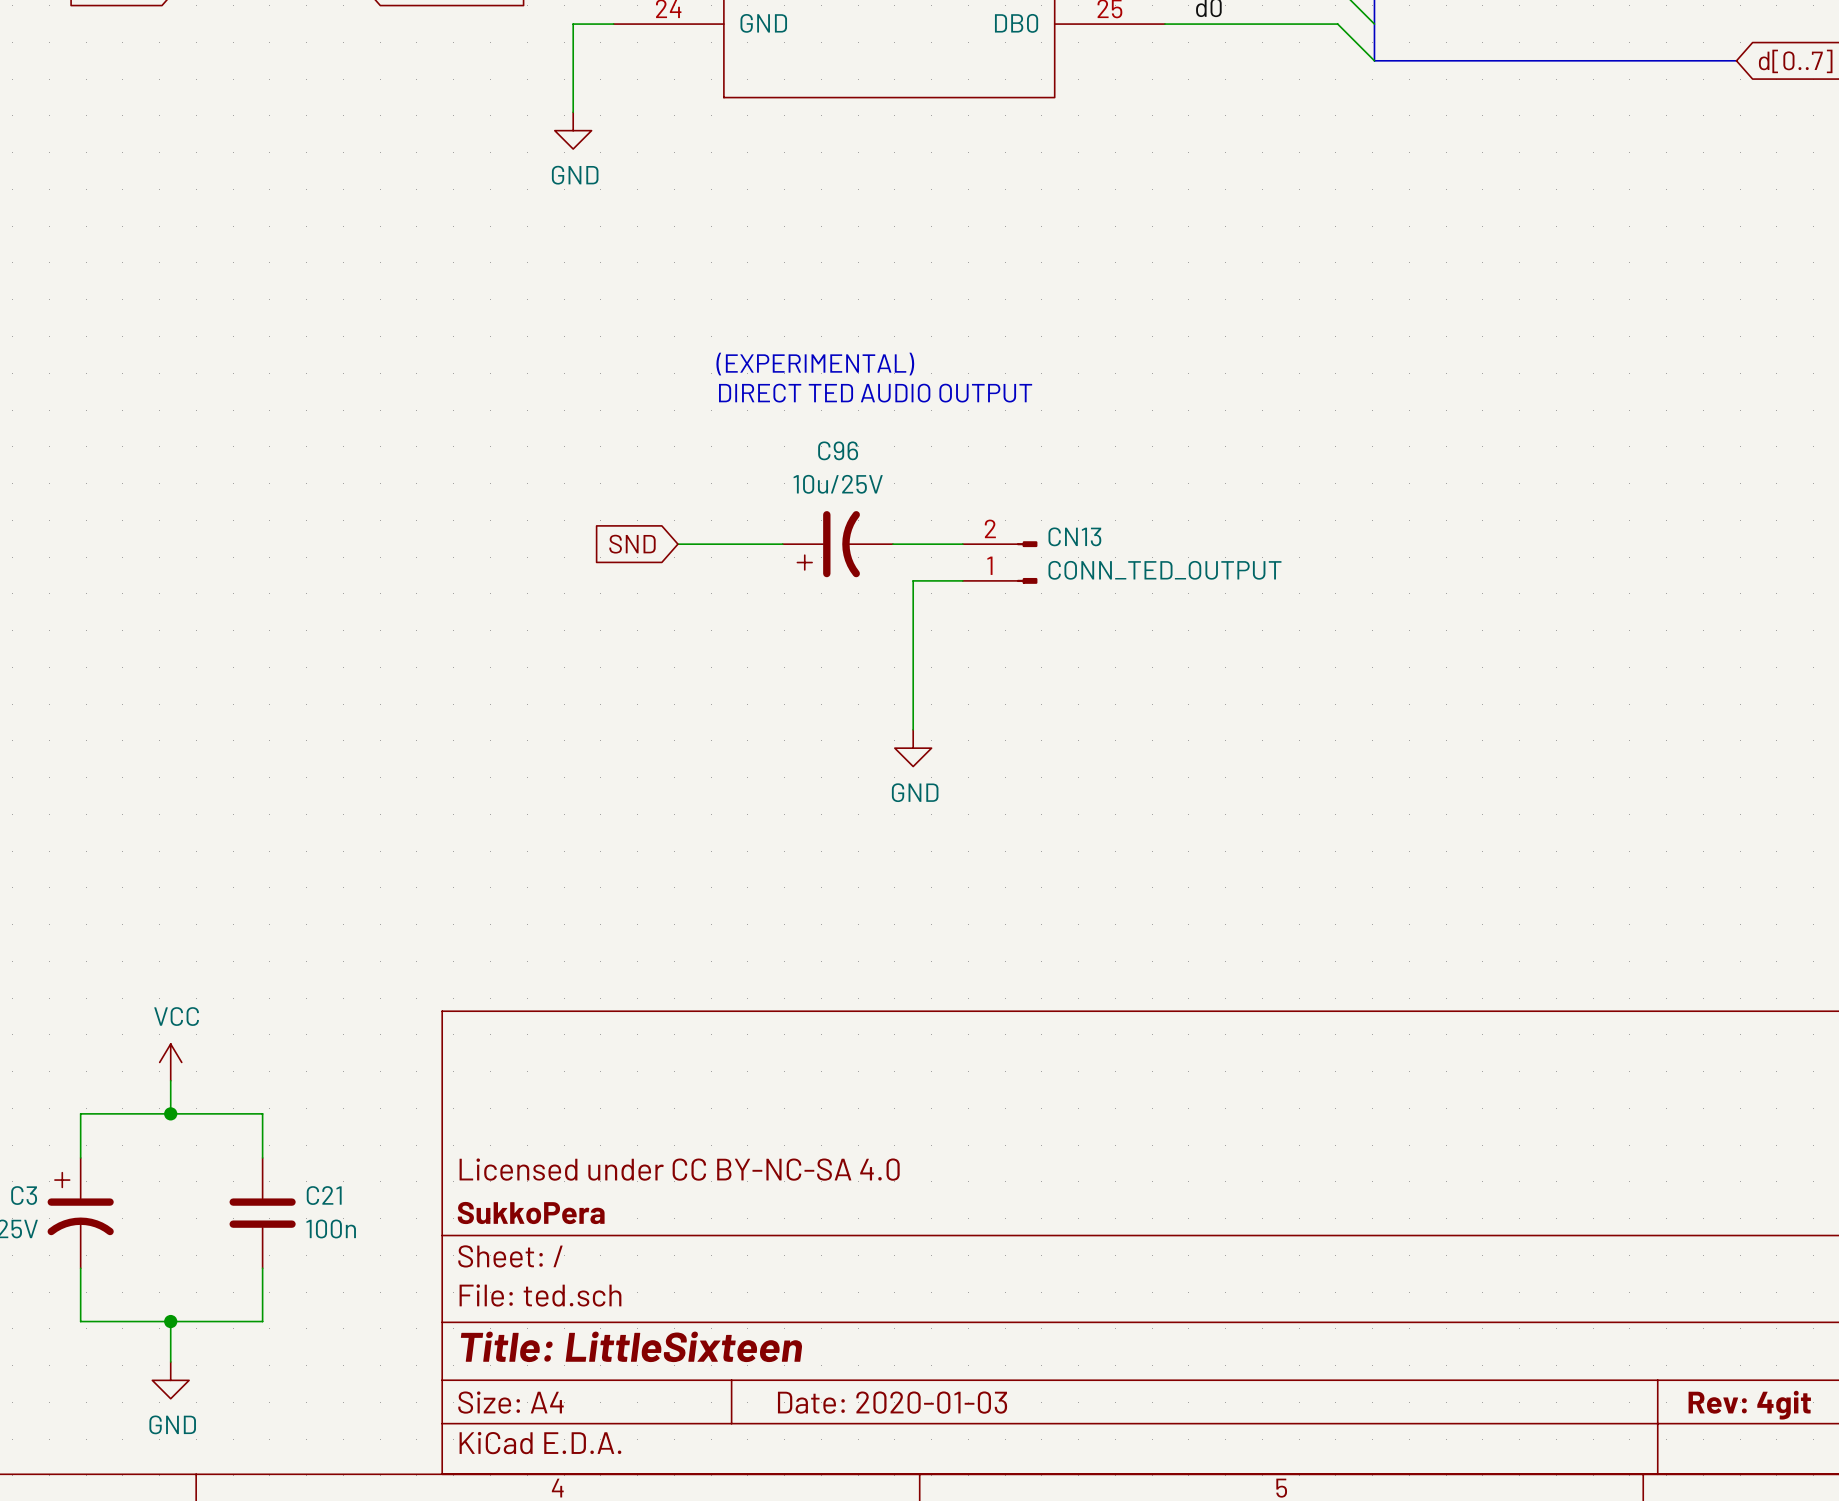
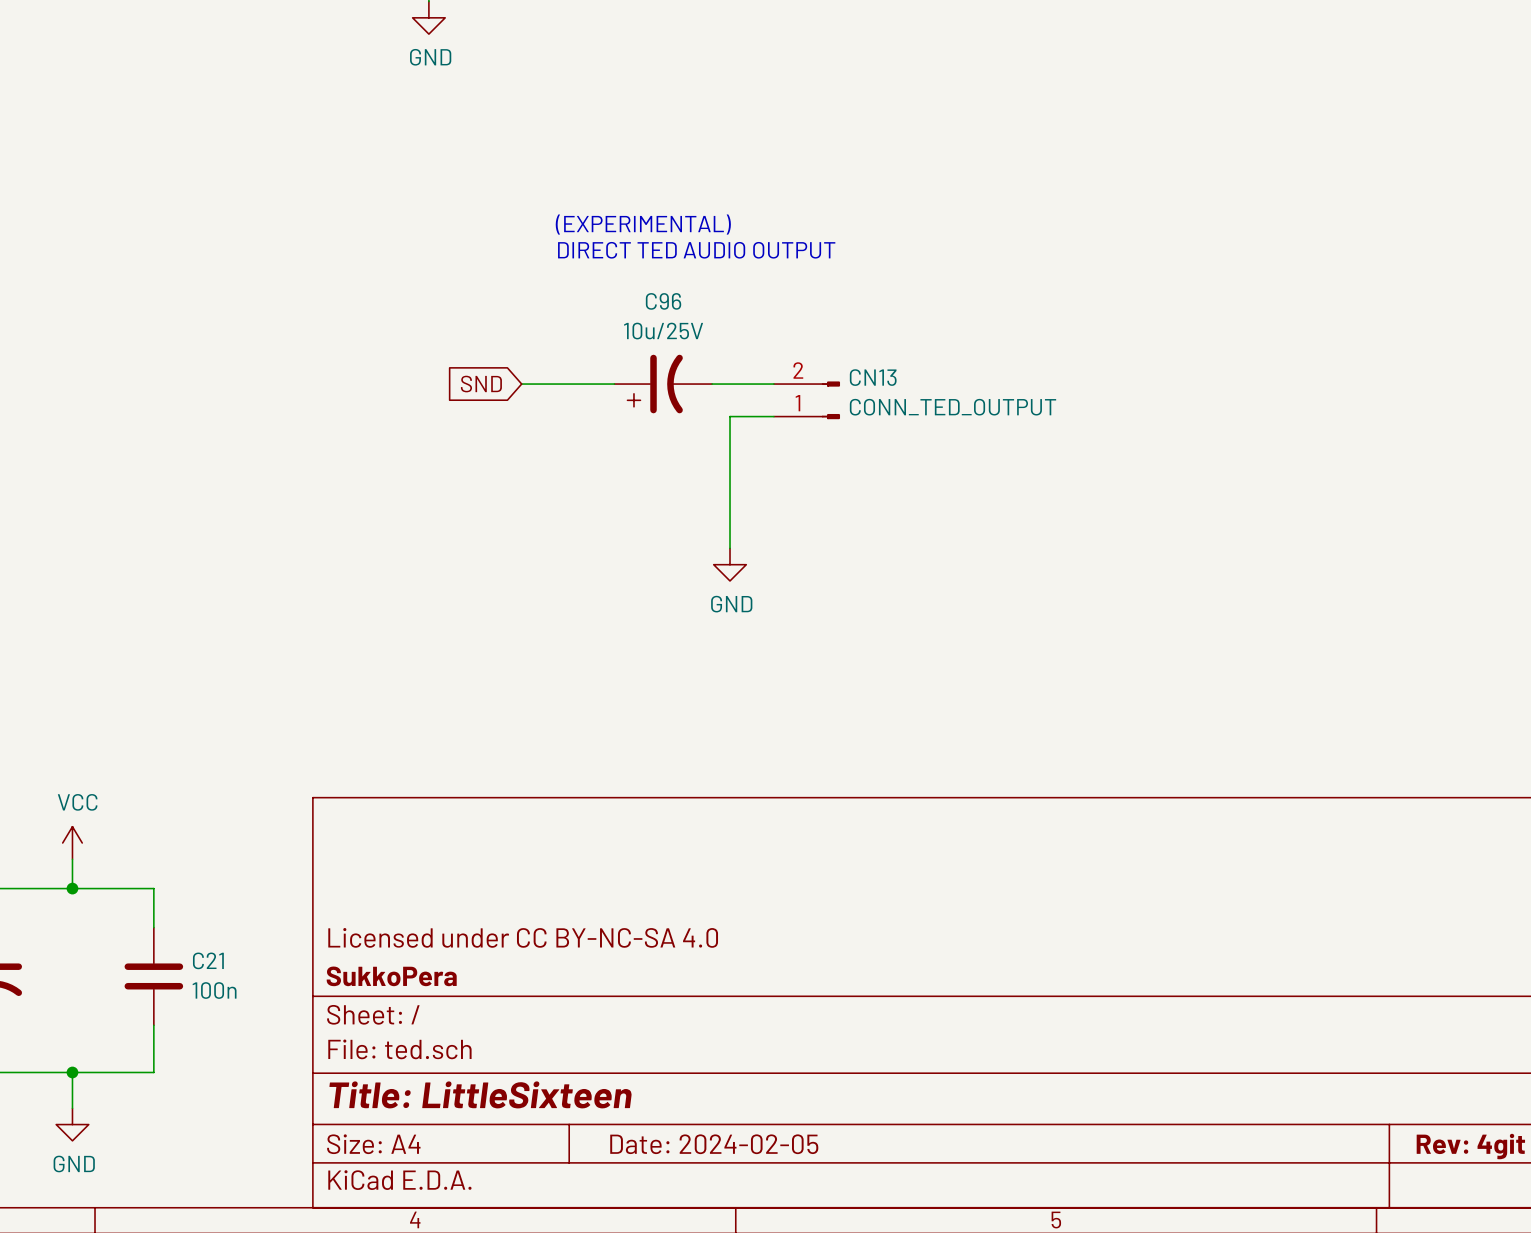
title block: Date: 2020-01-03 (892, 1402) -> Date: 2024-02-05 (714, 1144)

